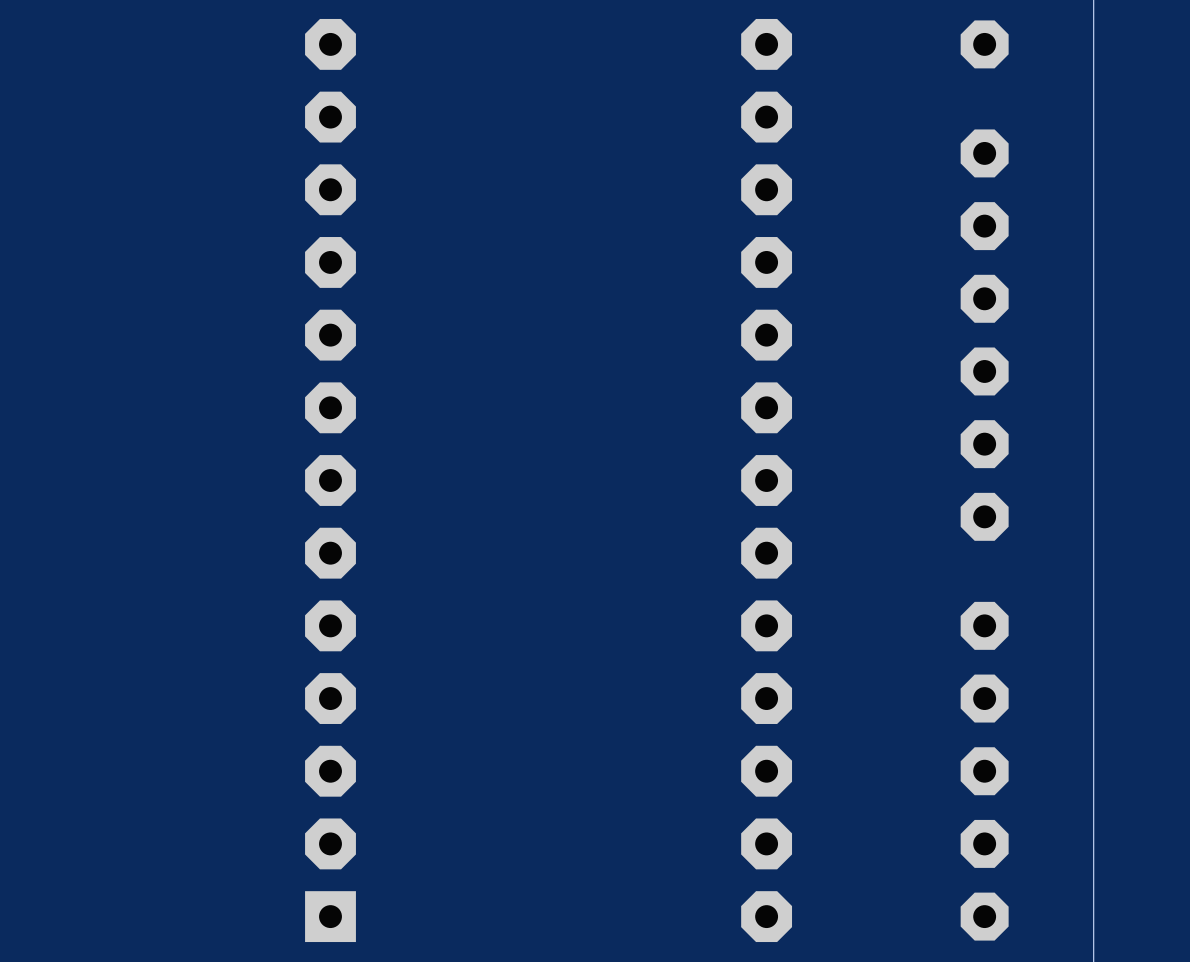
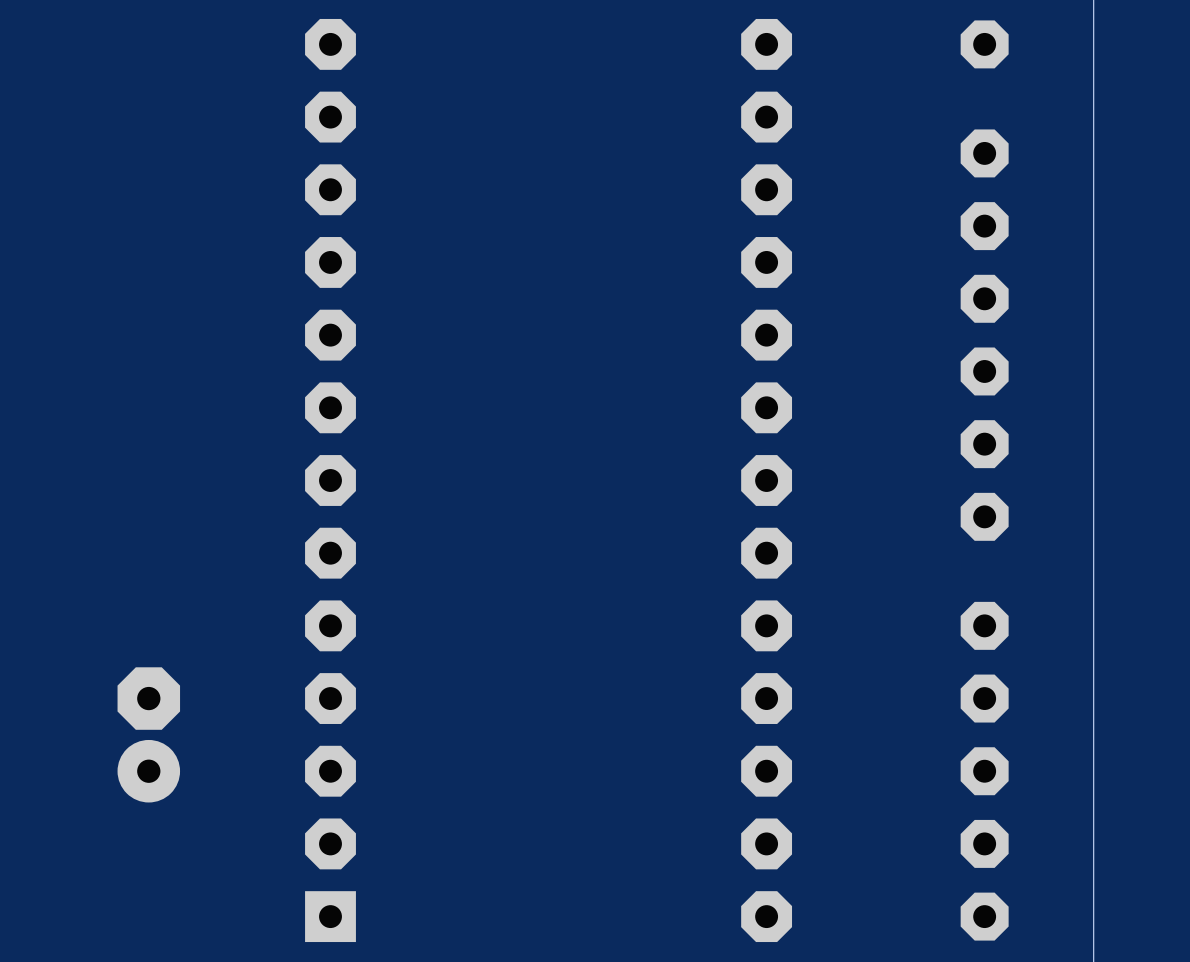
part: none -> (148, 734)

